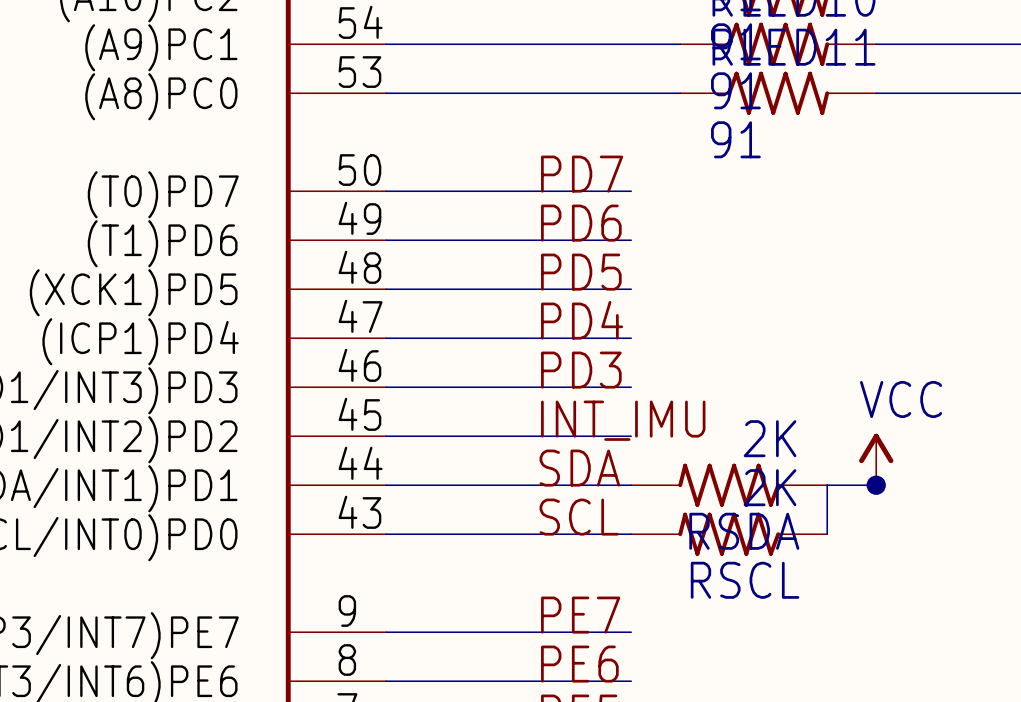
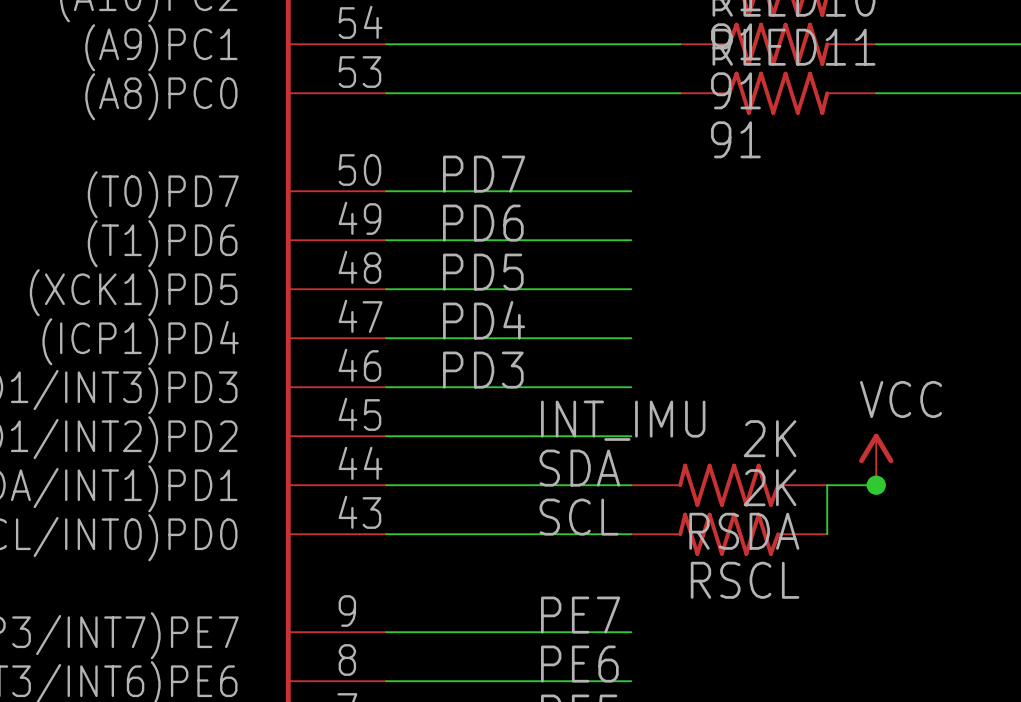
label position: PD7 (582, 174) -> PD7 (484, 174)
label position: PD6 (581, 223) -> PD6 (483, 223)
label position: PD5 (581, 272) -> PD5 (483, 272)
label position: PD4 (582, 320) -> PD4 (484, 320)
label position: PD3 (581, 370) -> PD3 (483, 370)

